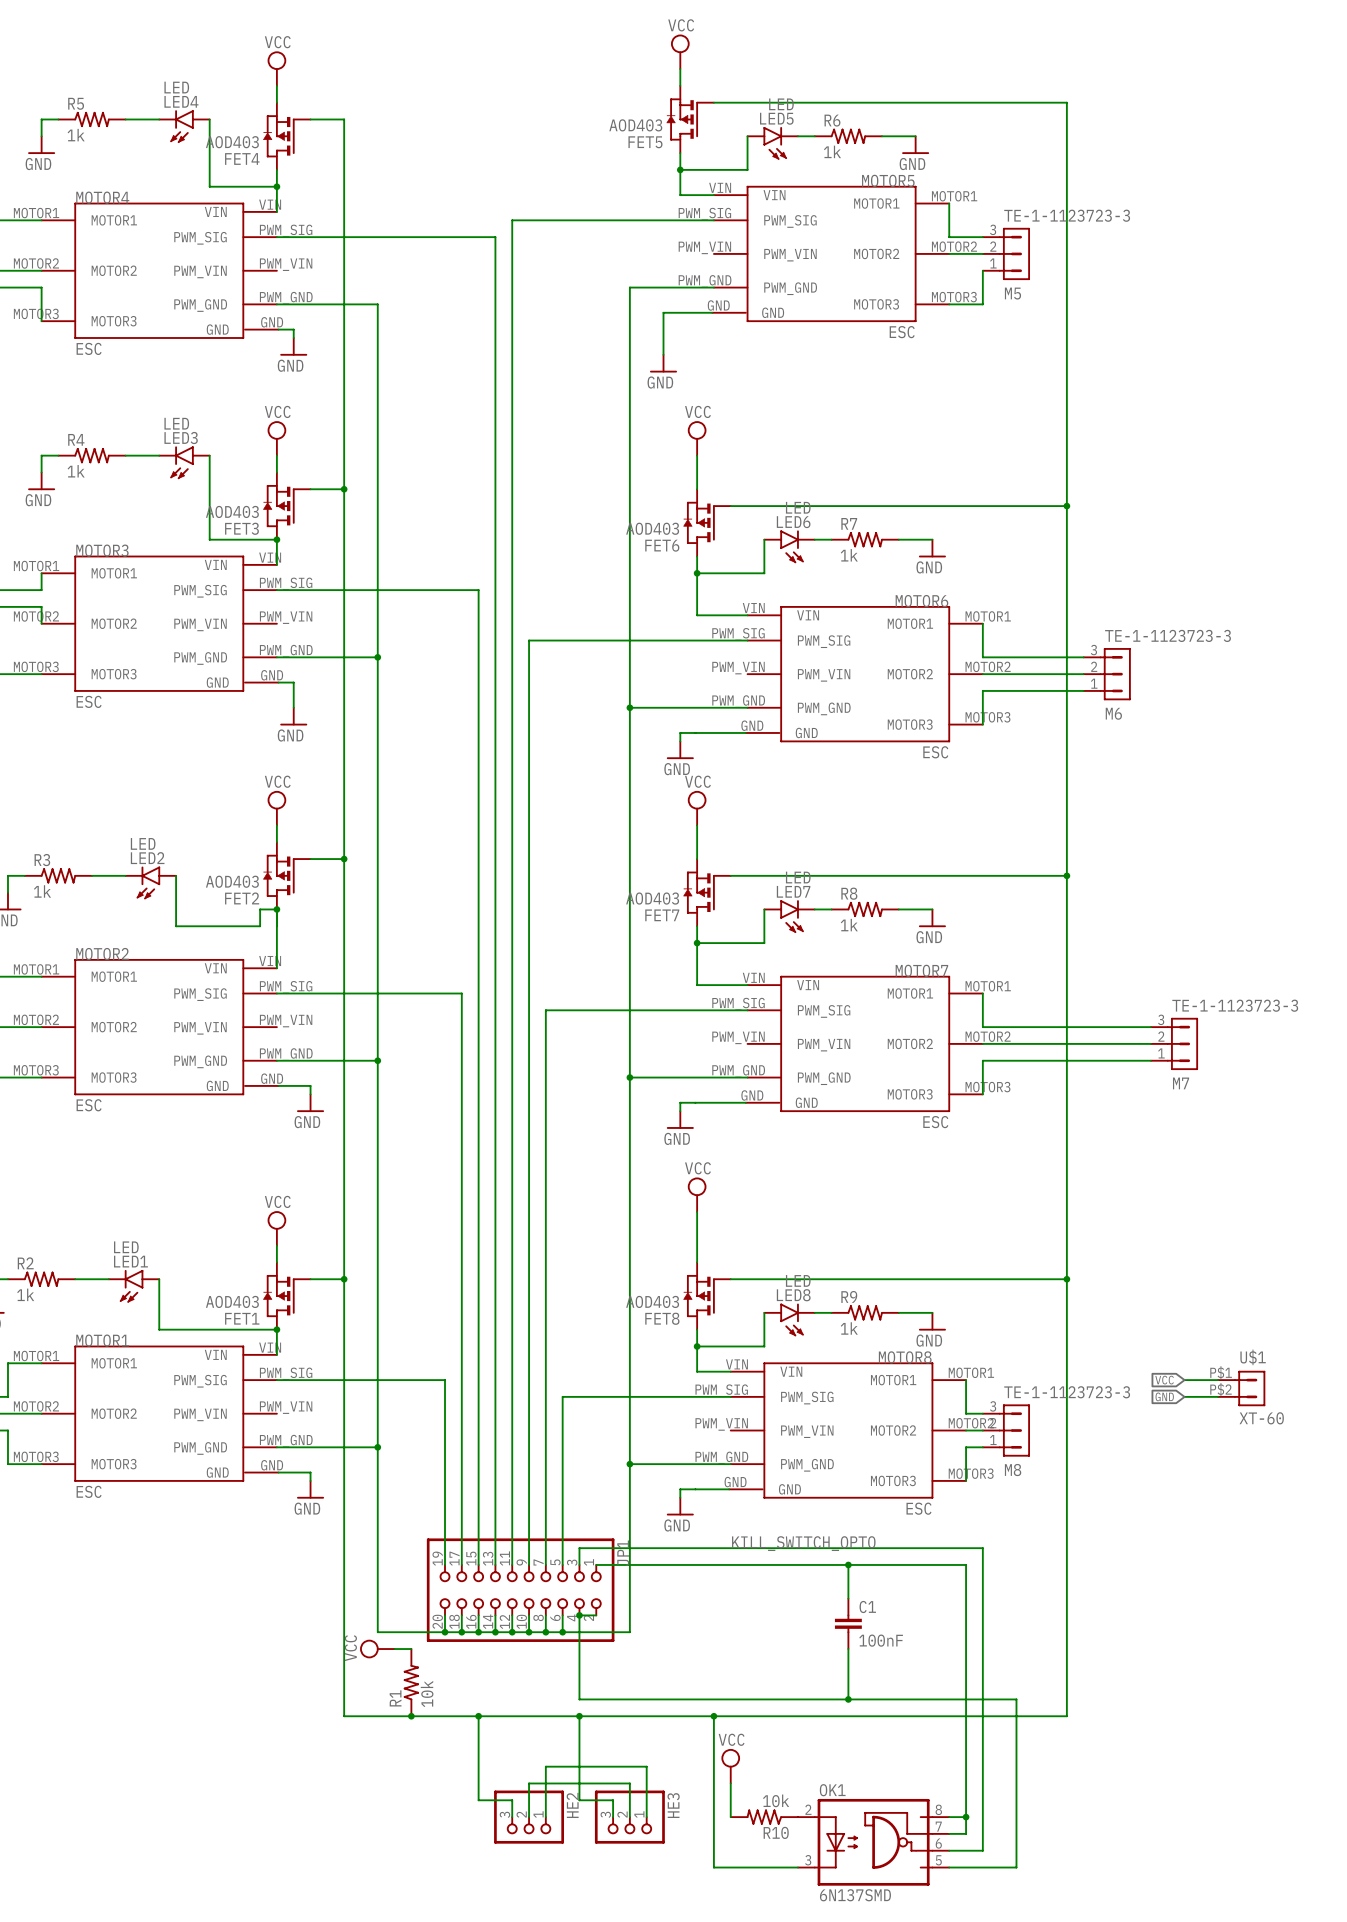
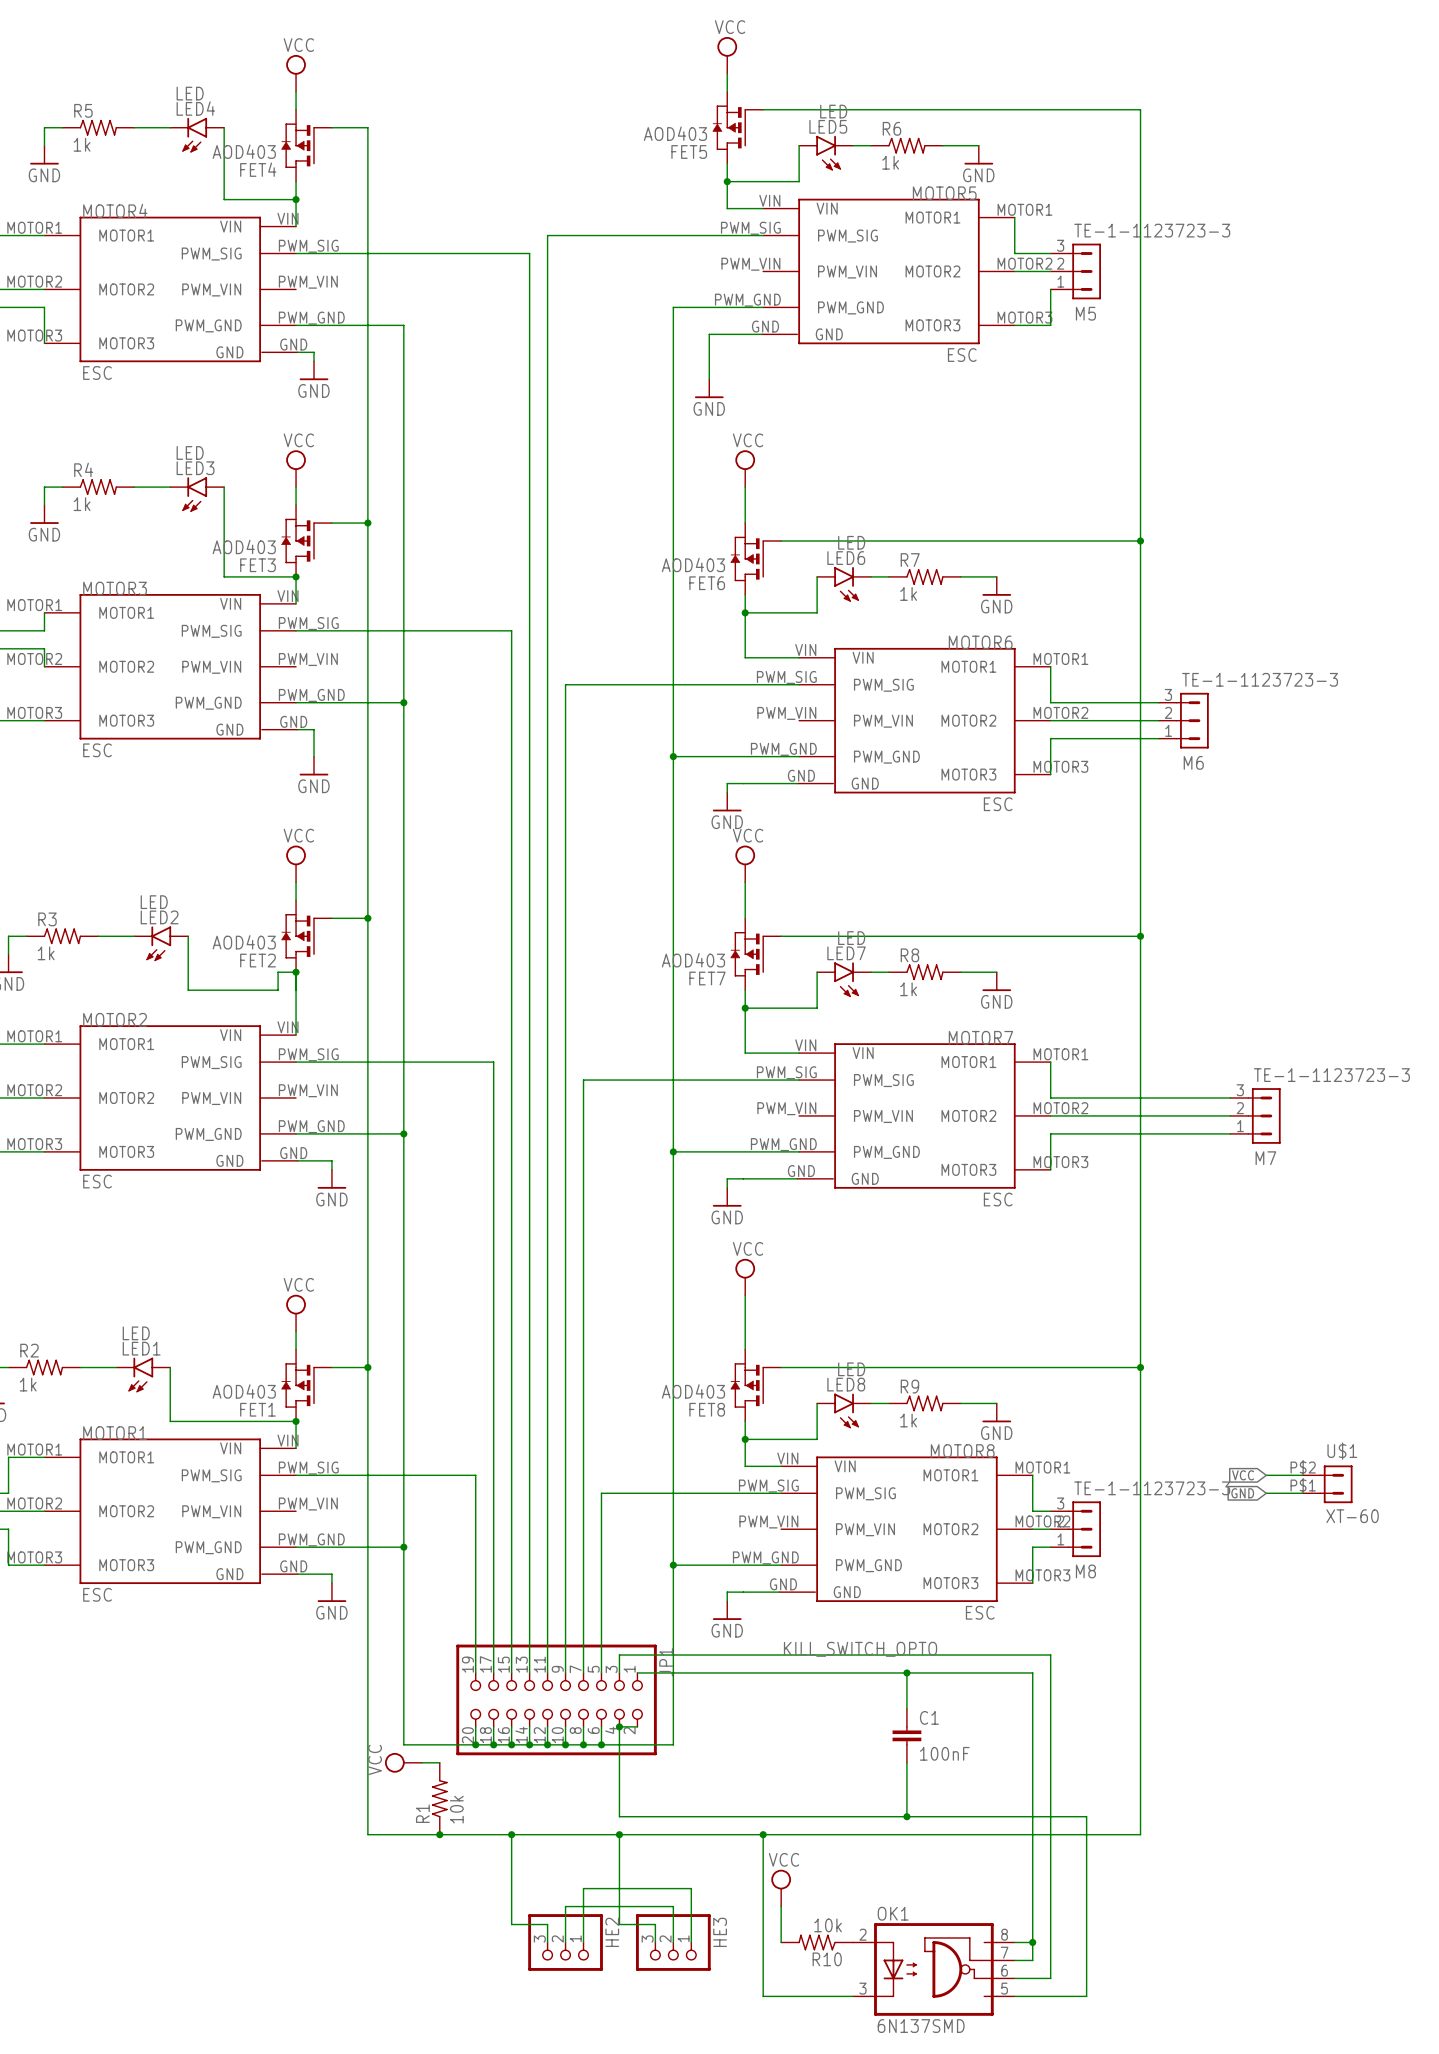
U$1 flip: as is (1249, 1388) -> up-down (1336, 1484)

